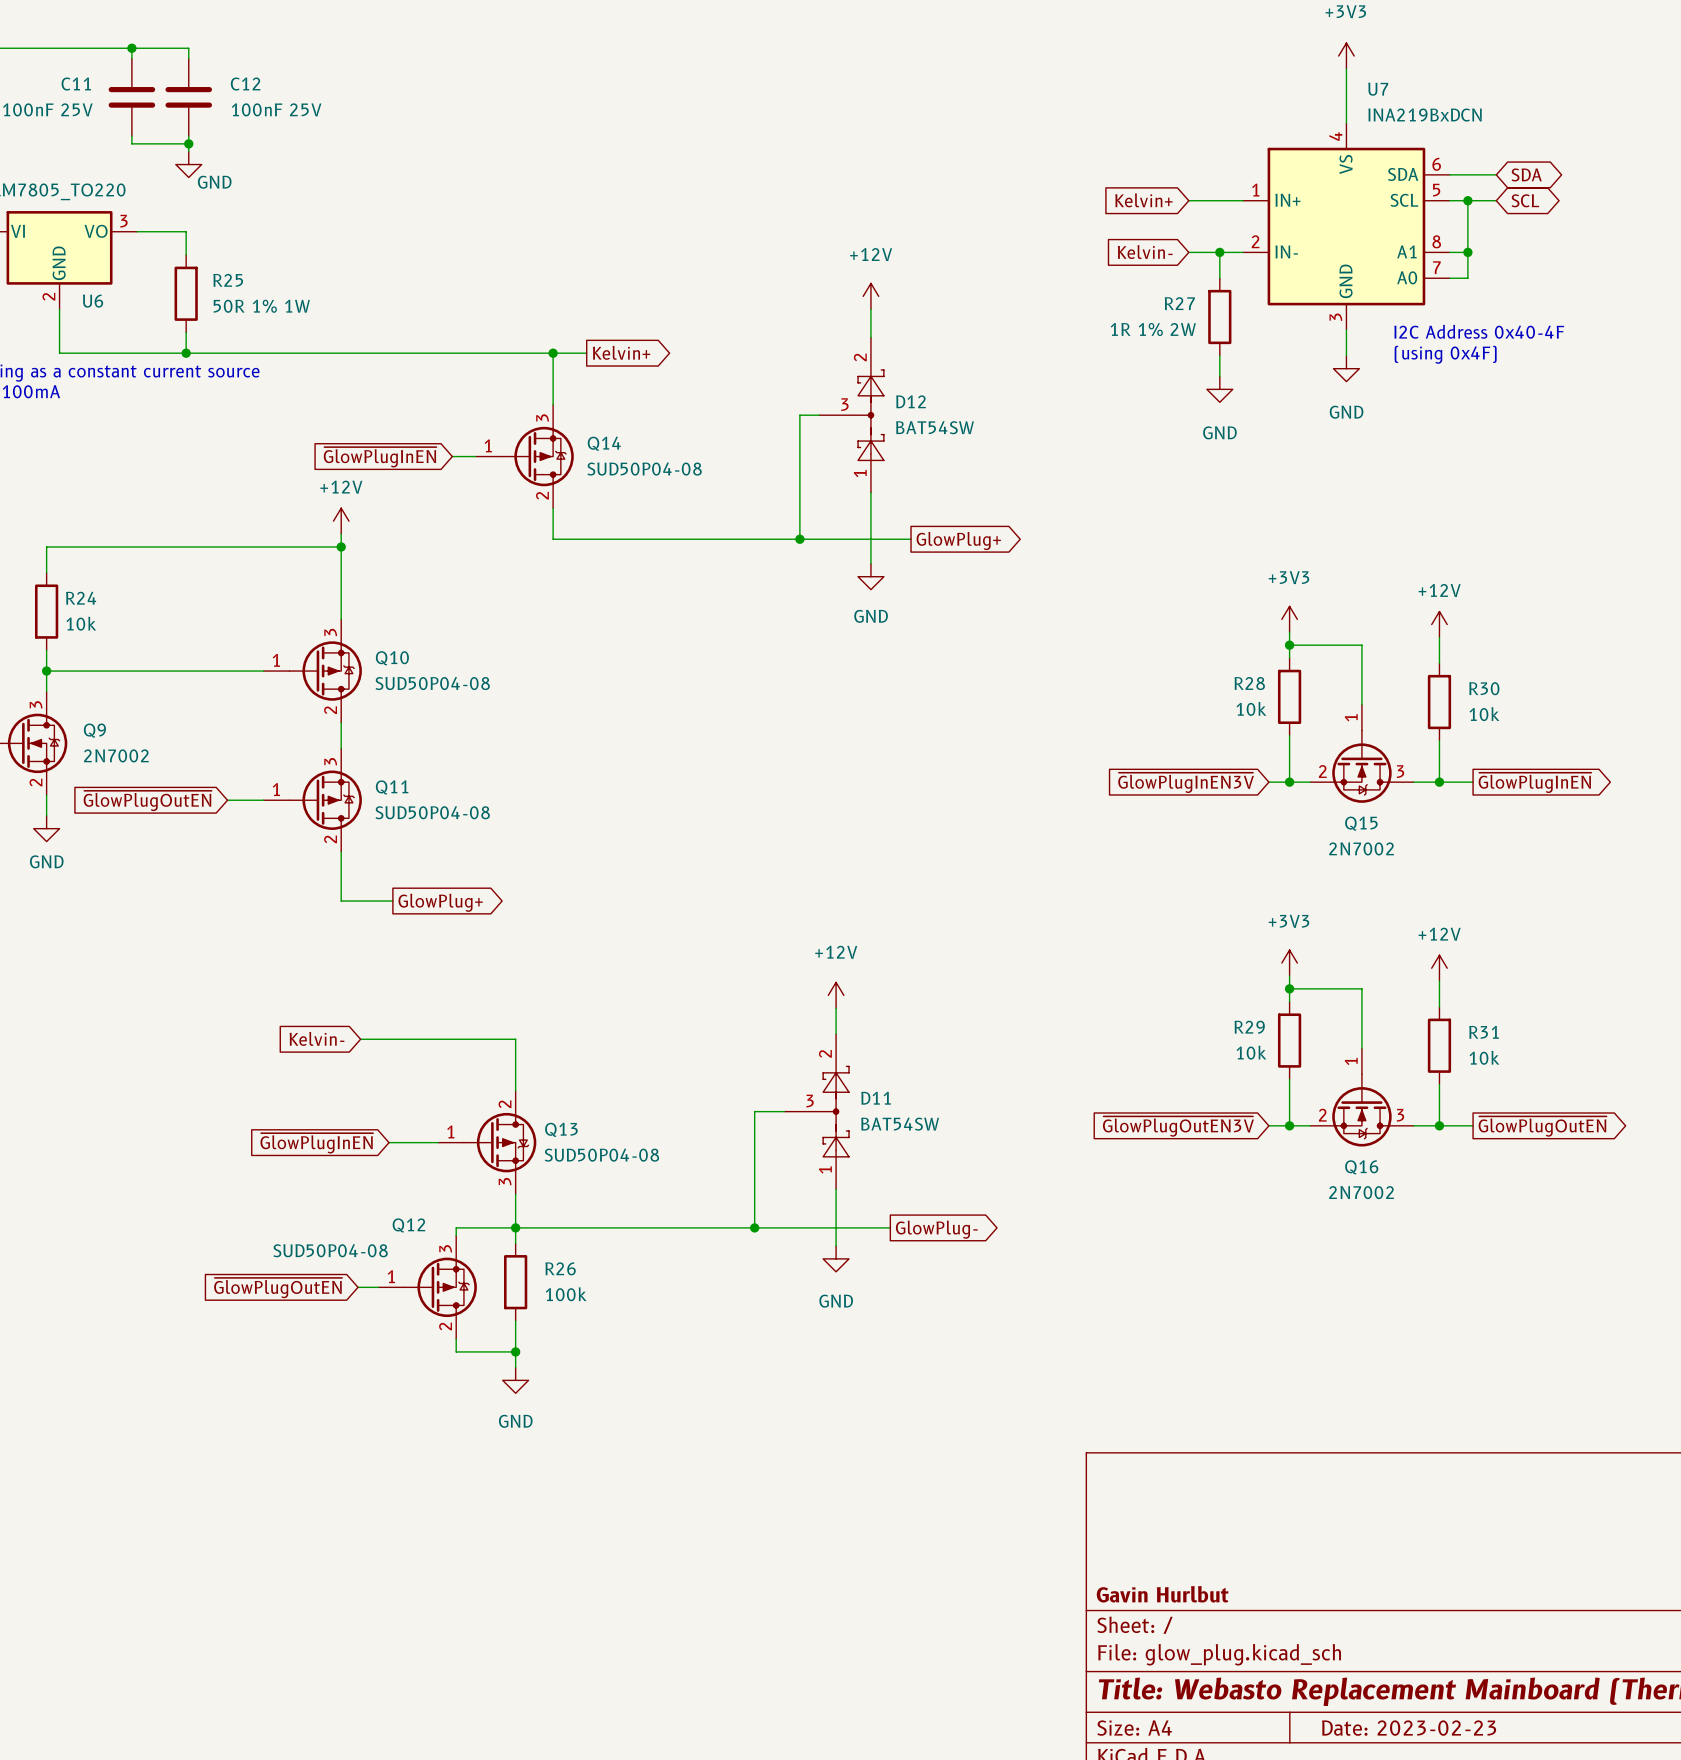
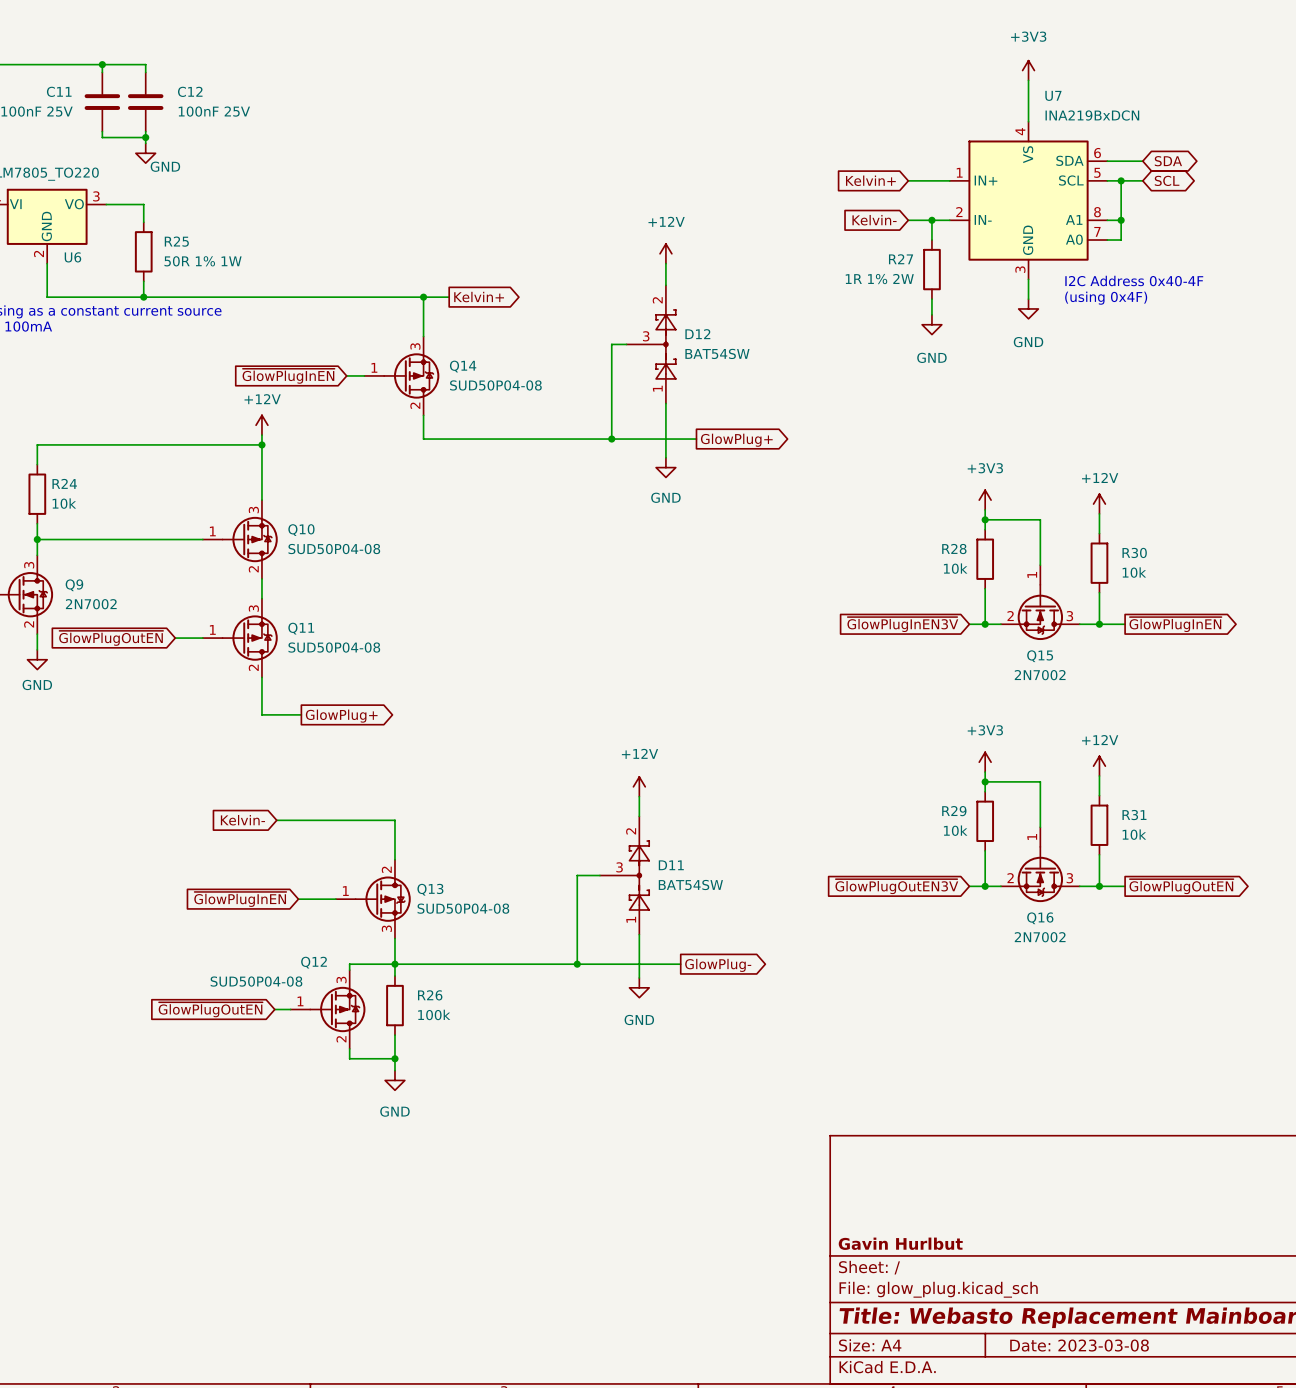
title block: Date: 2023-02-23 (1409, 1728) -> Date: 2023-03-08 (1079, 1345)

